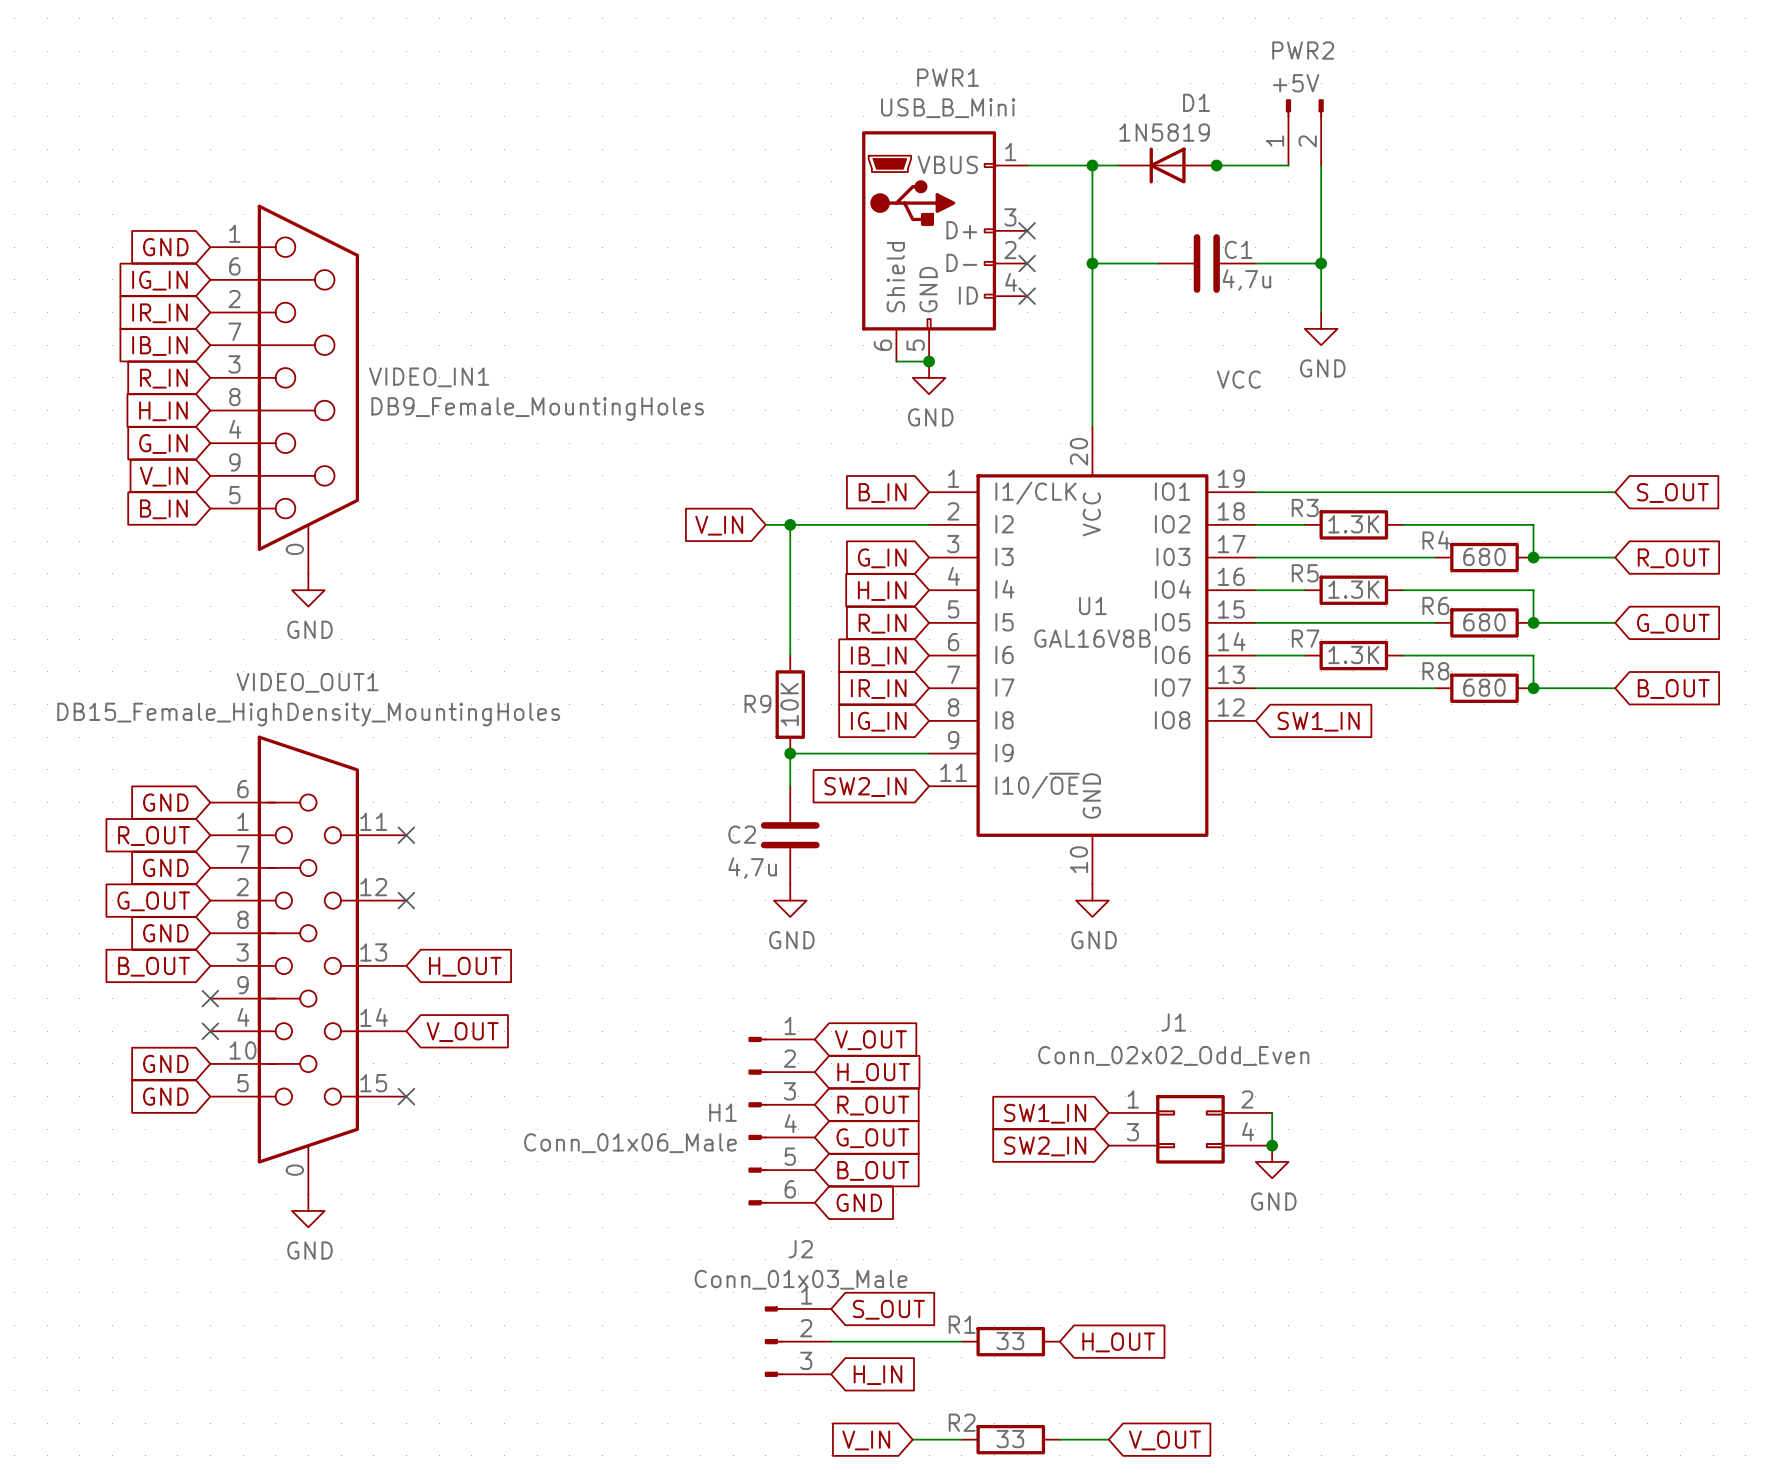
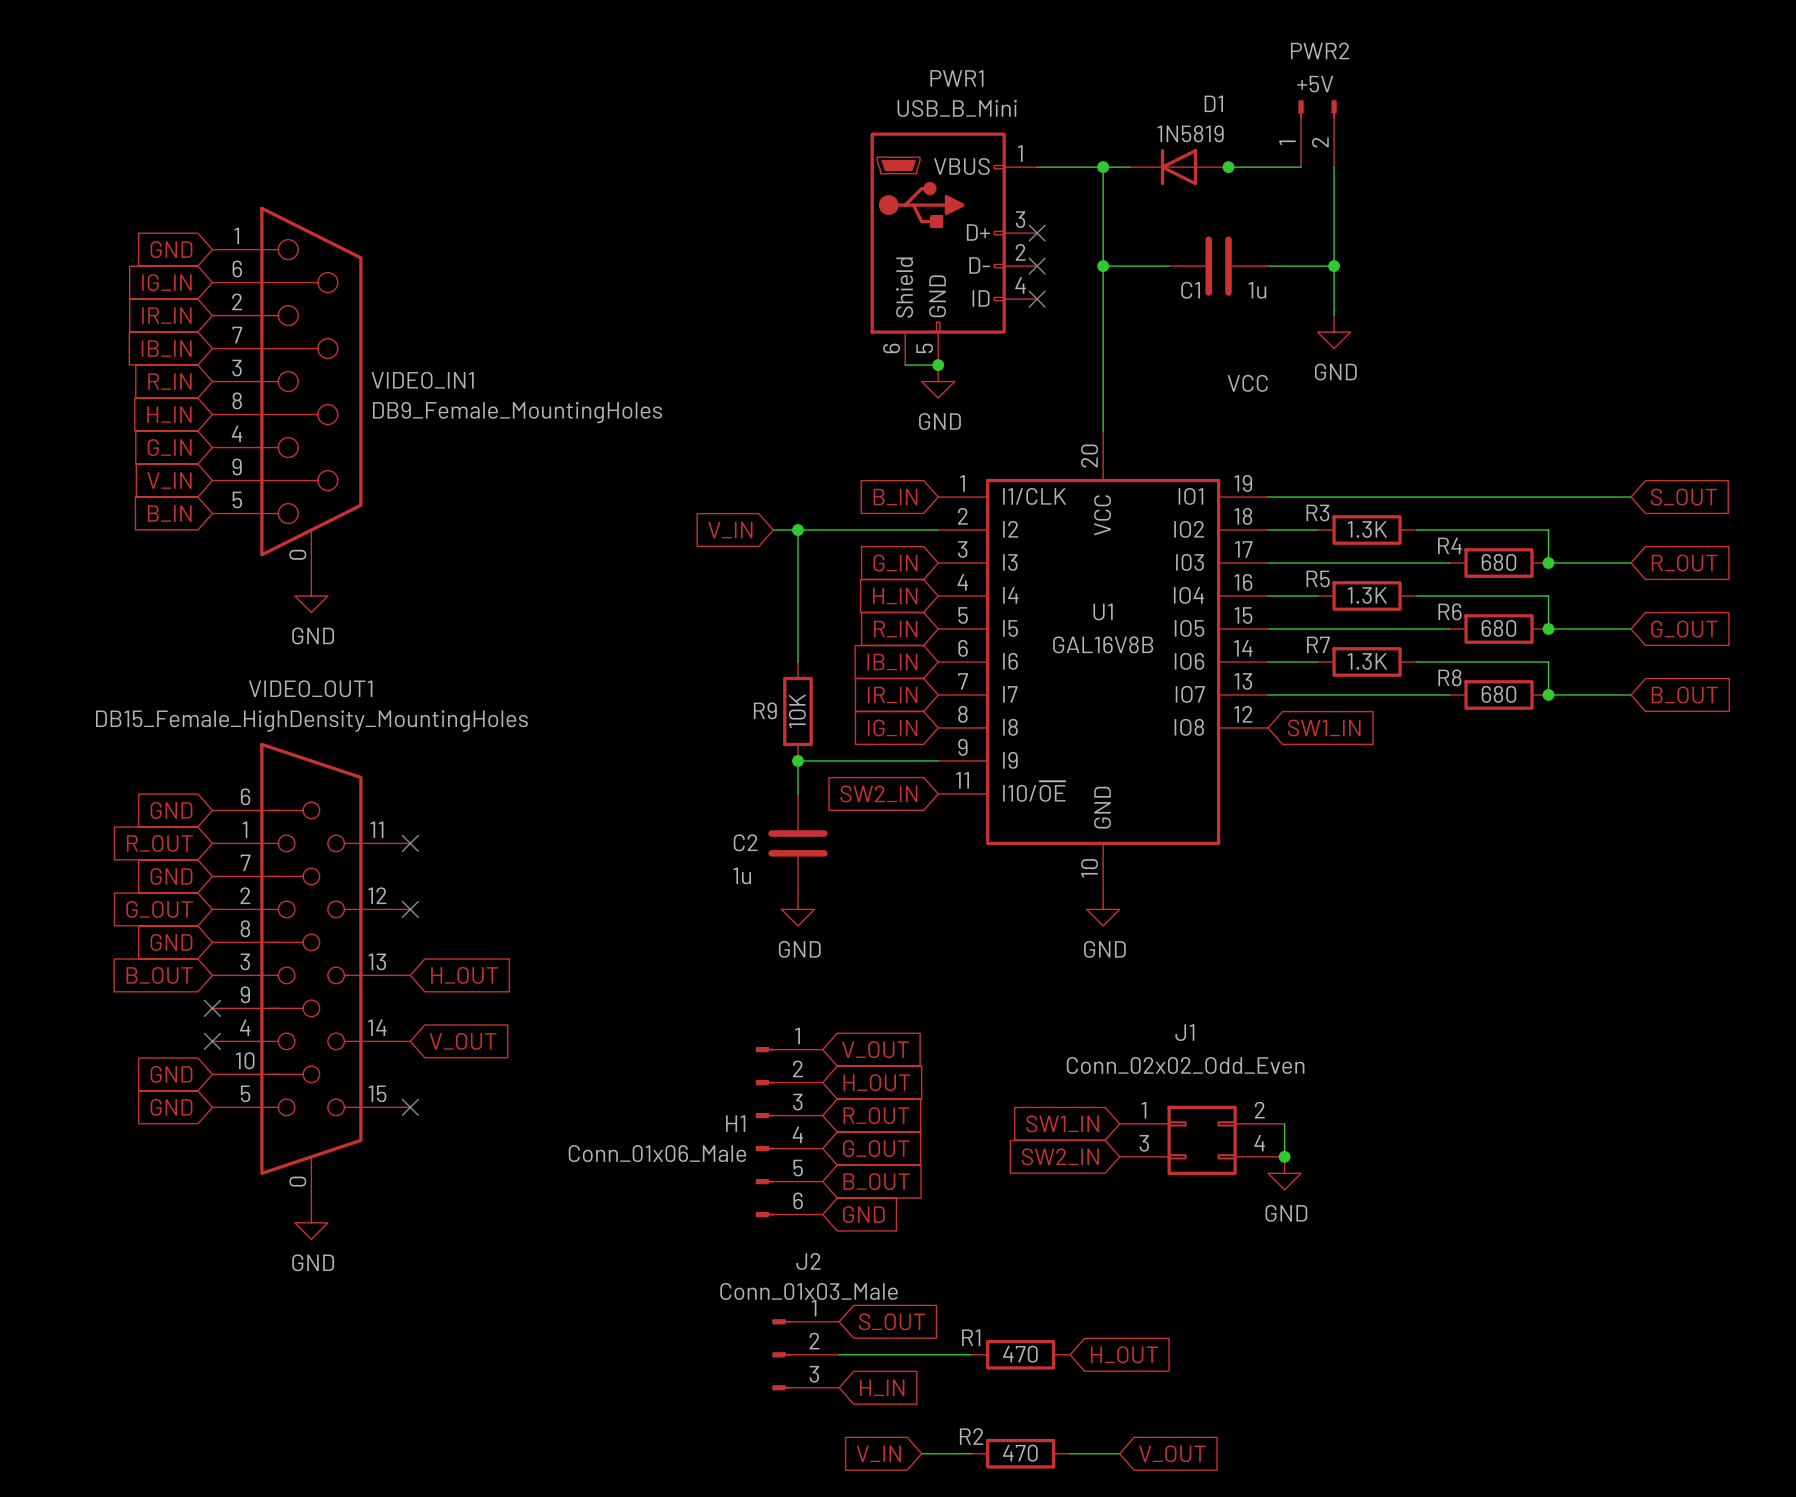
C1 name position: C1 (1238, 249) -> C1 (1190, 290)
C1 value: 4,7u (1246, 280) -> 1u (1257, 290)
C2 value: 4,7u (752, 868) -> 1u (742, 875)
R1 value: 33 (1010, 1341) -> 470 (1020, 1354)
R2 value: 33 (1010, 1439) -> 470 (1020, 1453)

